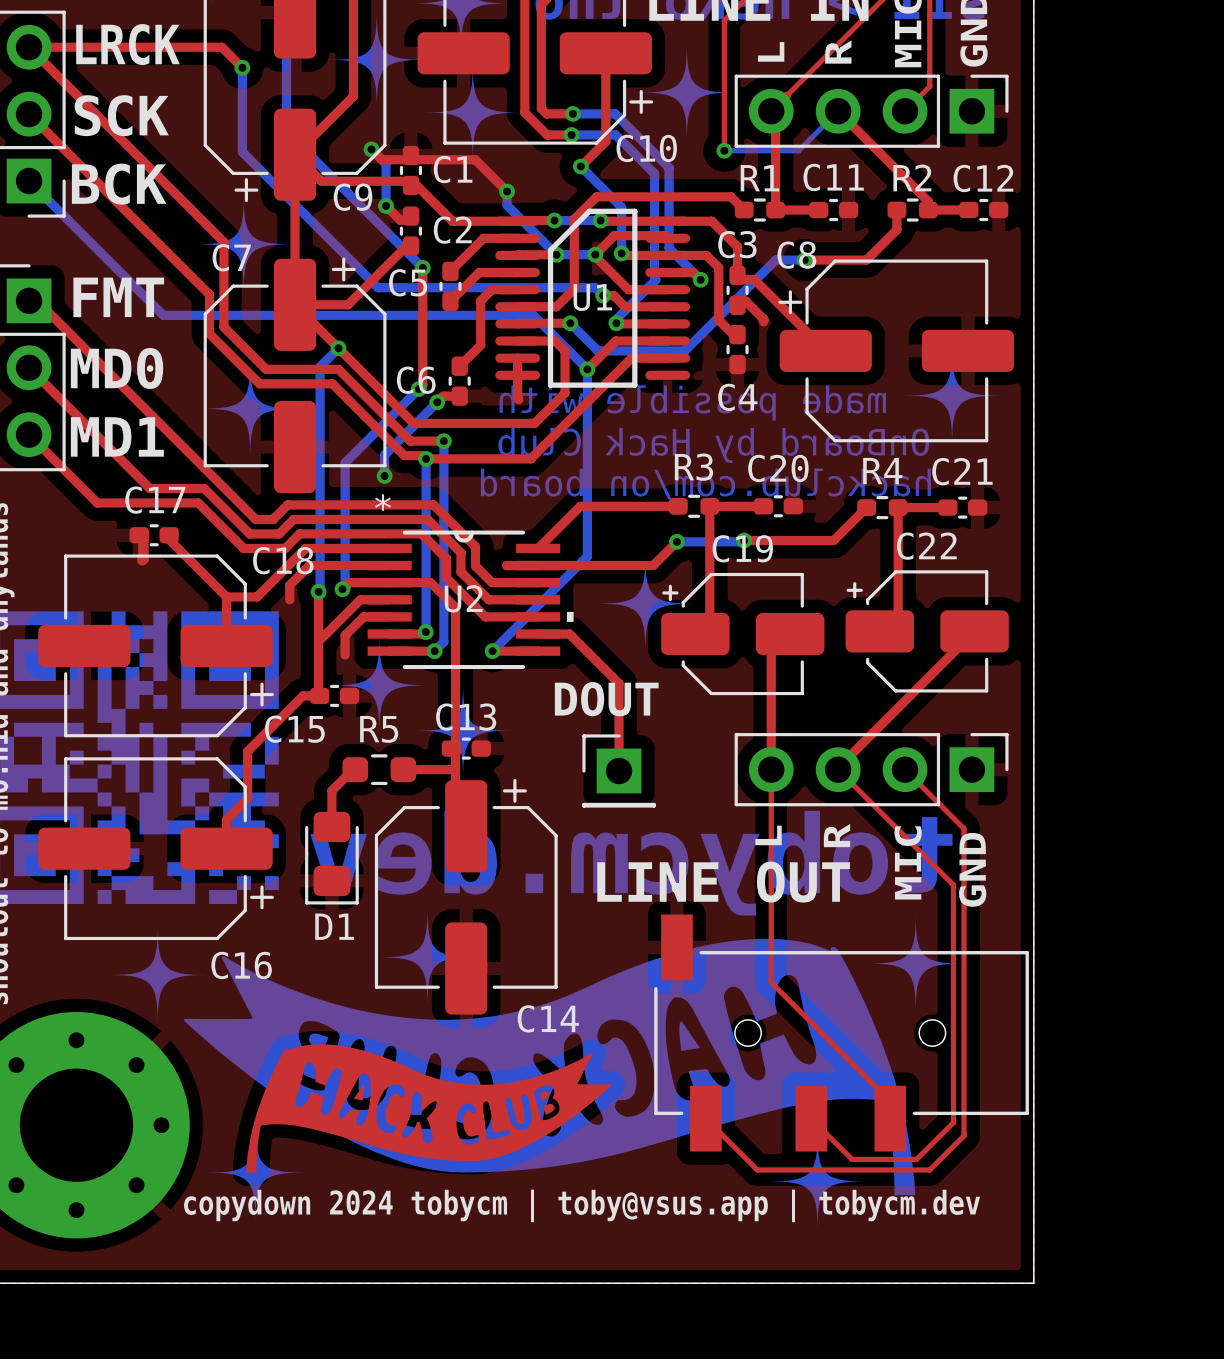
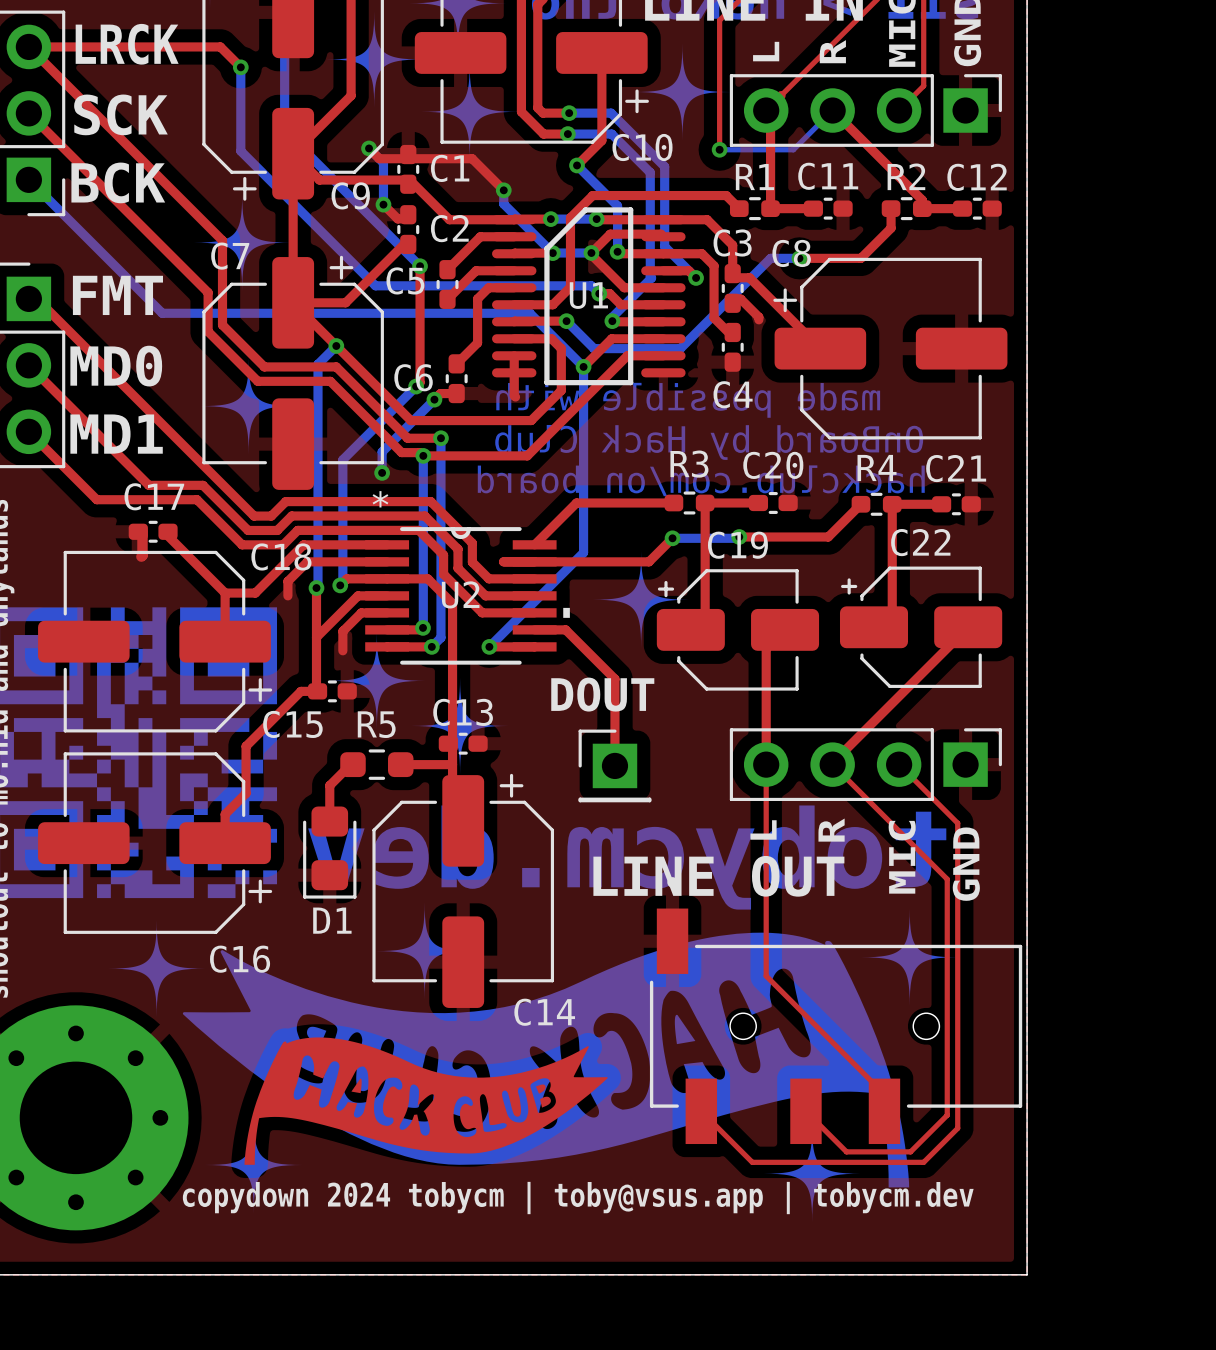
drawing: [903, 346, 1001, 445] -> none

